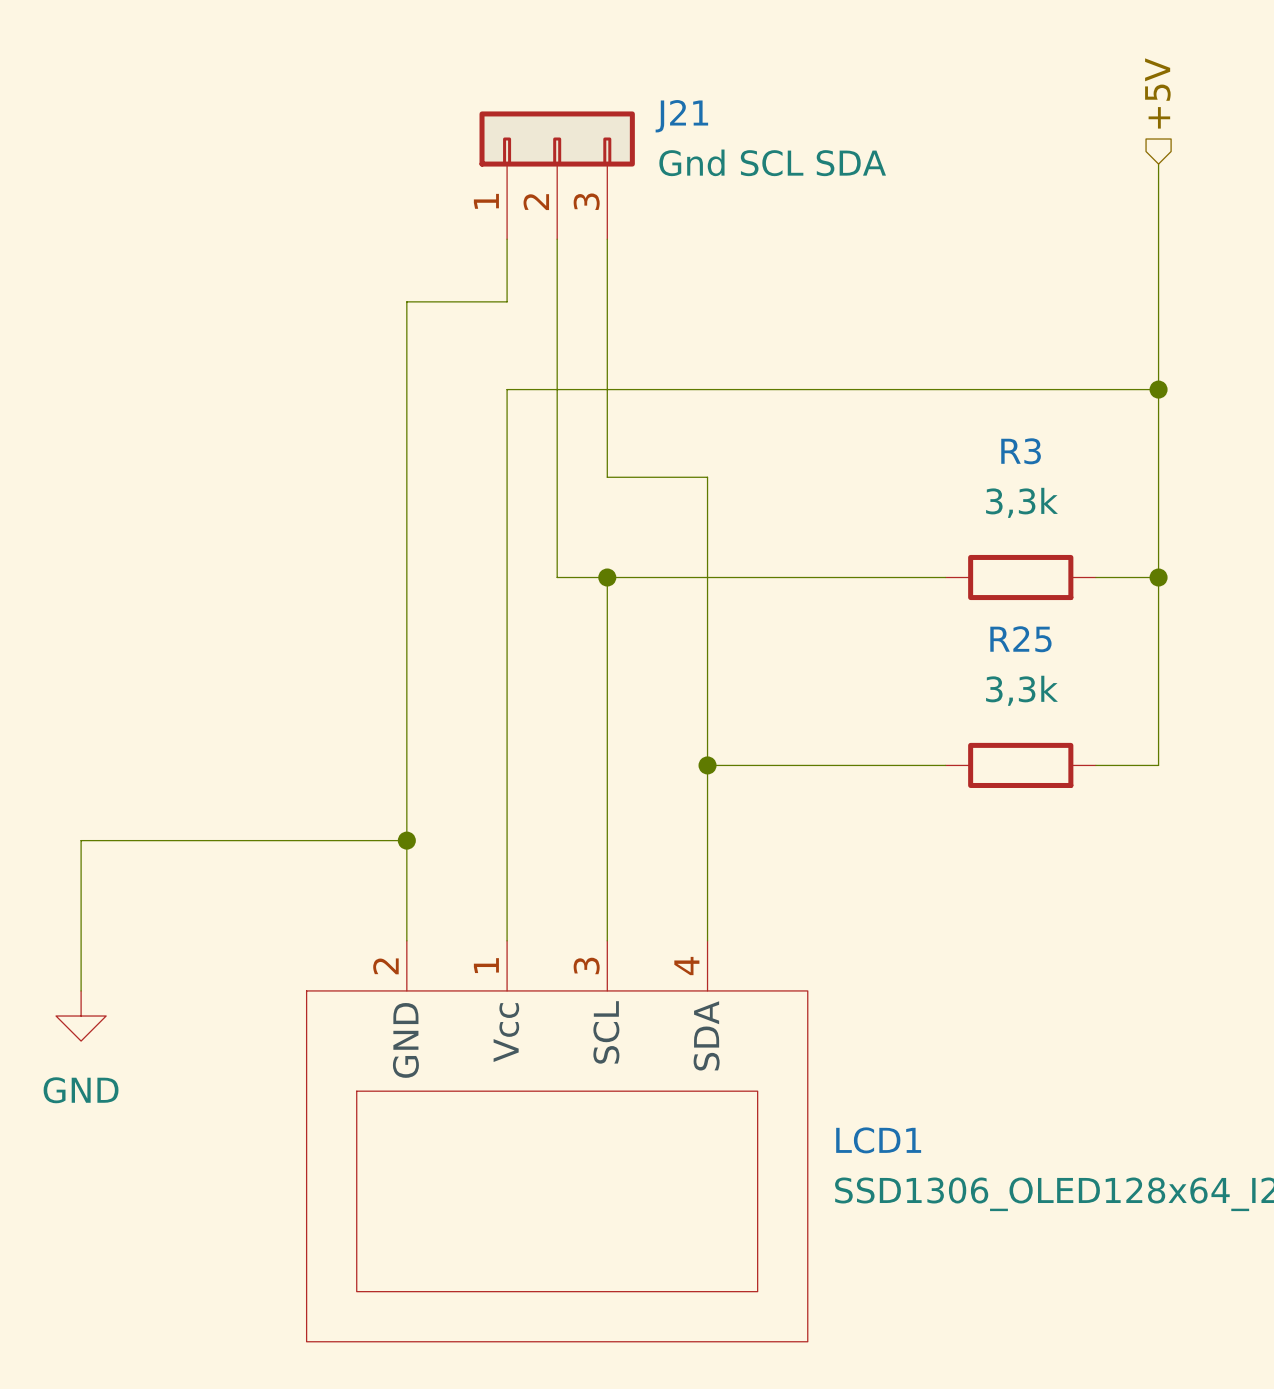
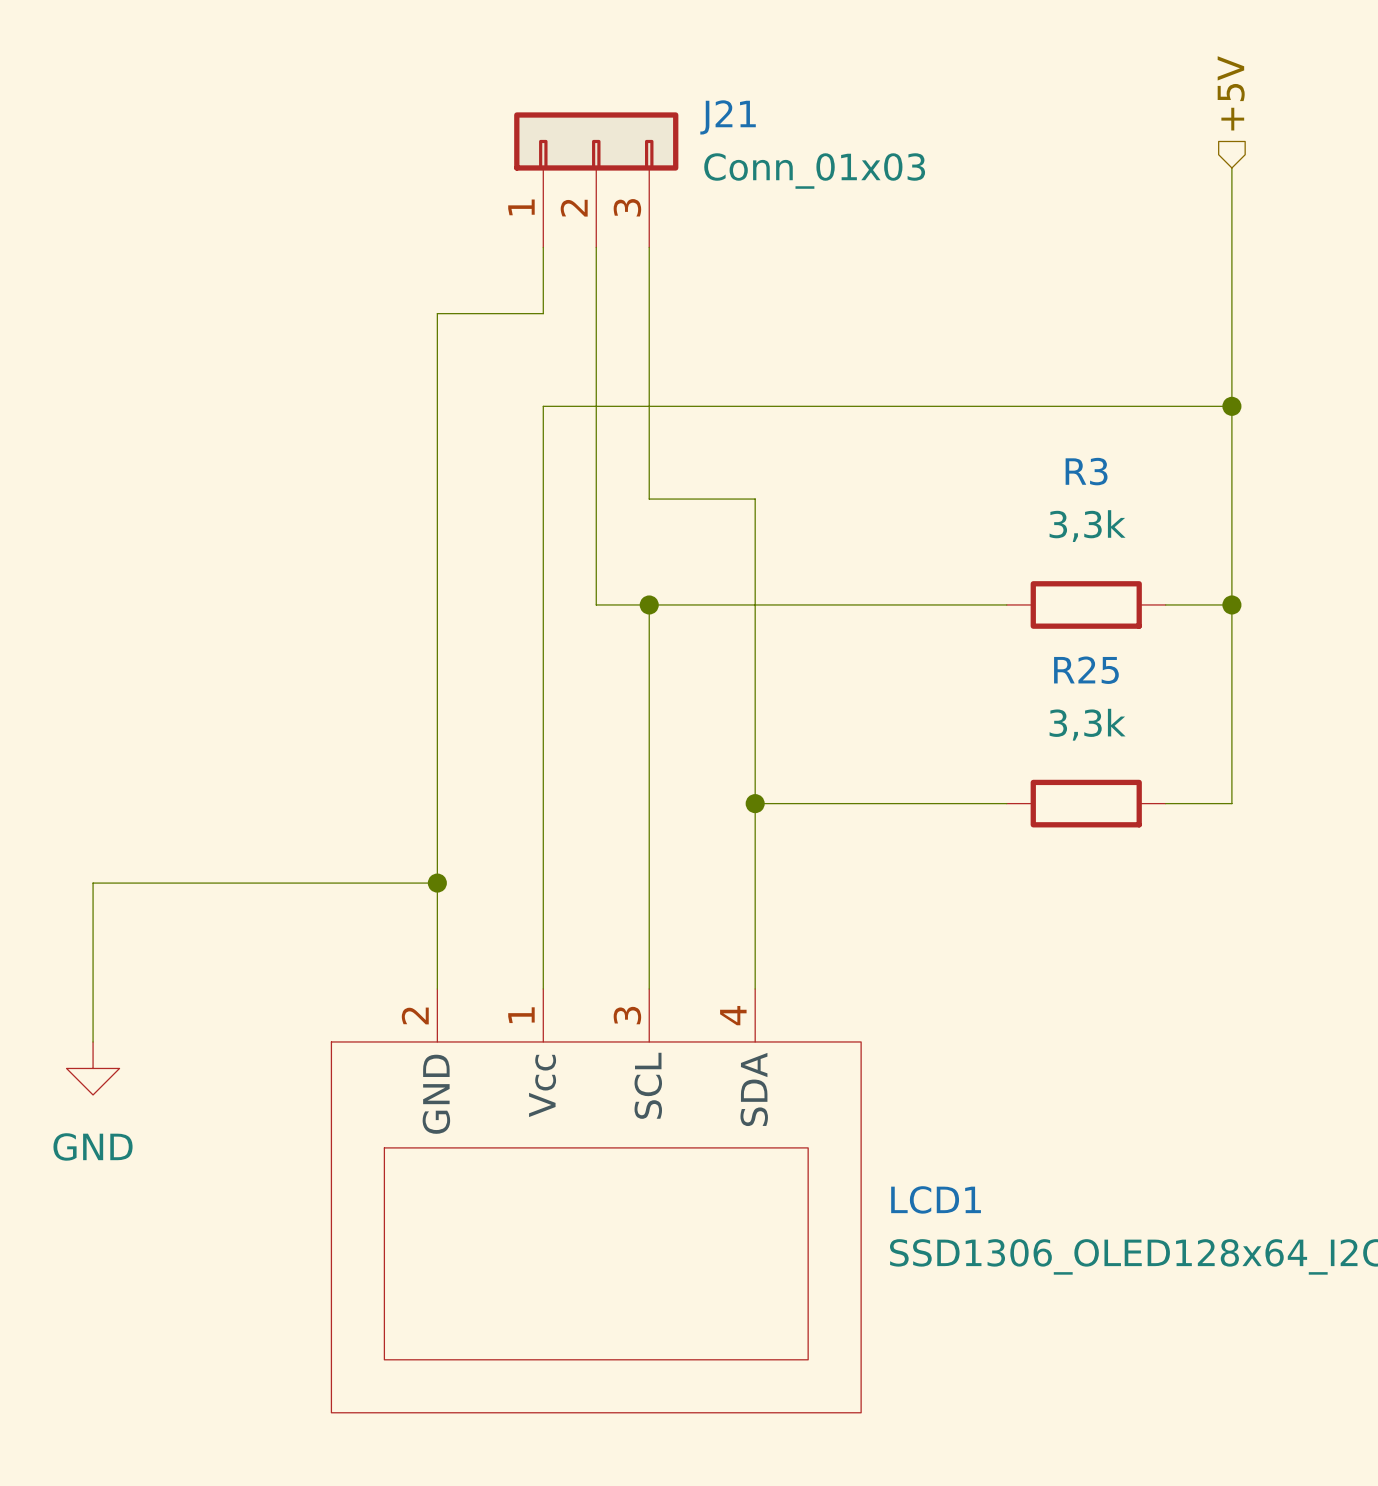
J21 value: Gnd SCL SDA (772, 162) -> Conn_01x03 (814, 171)

